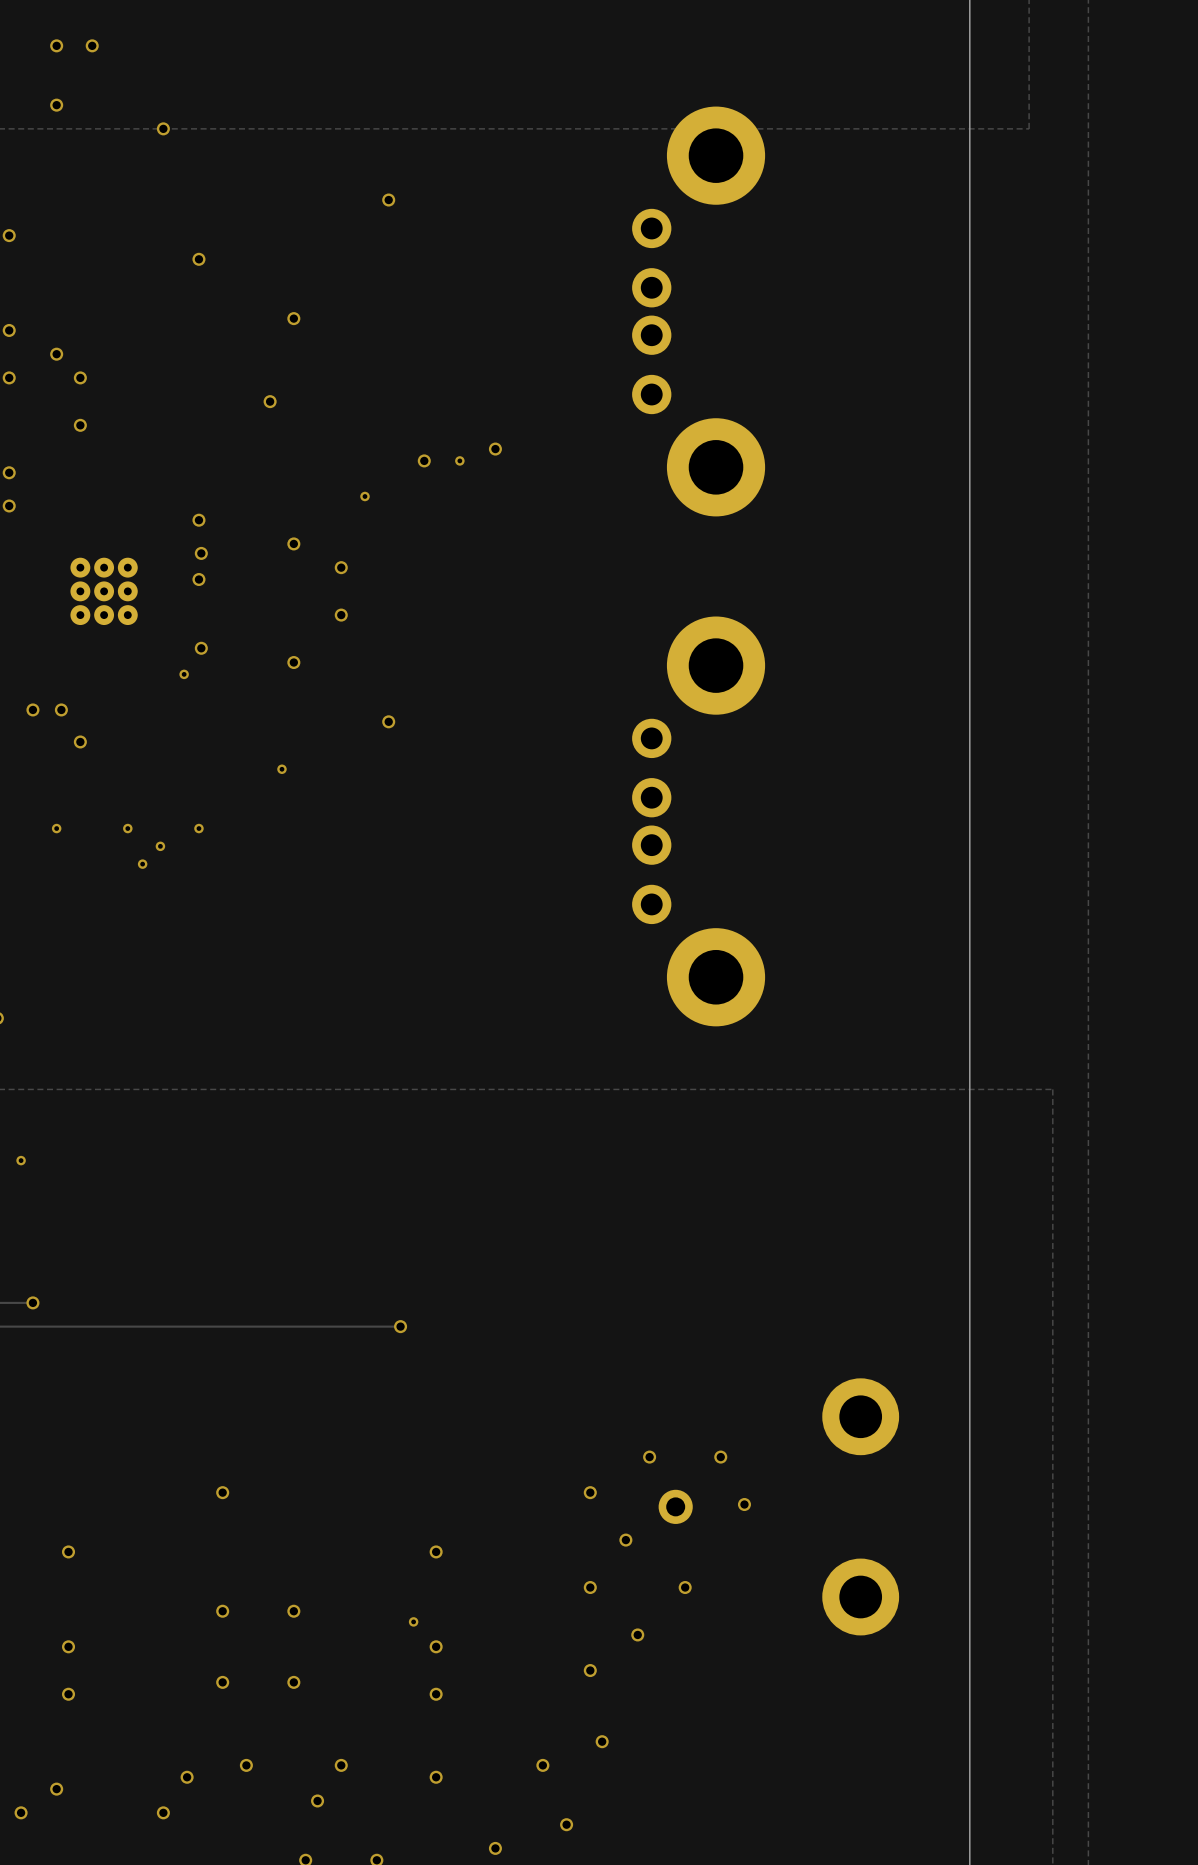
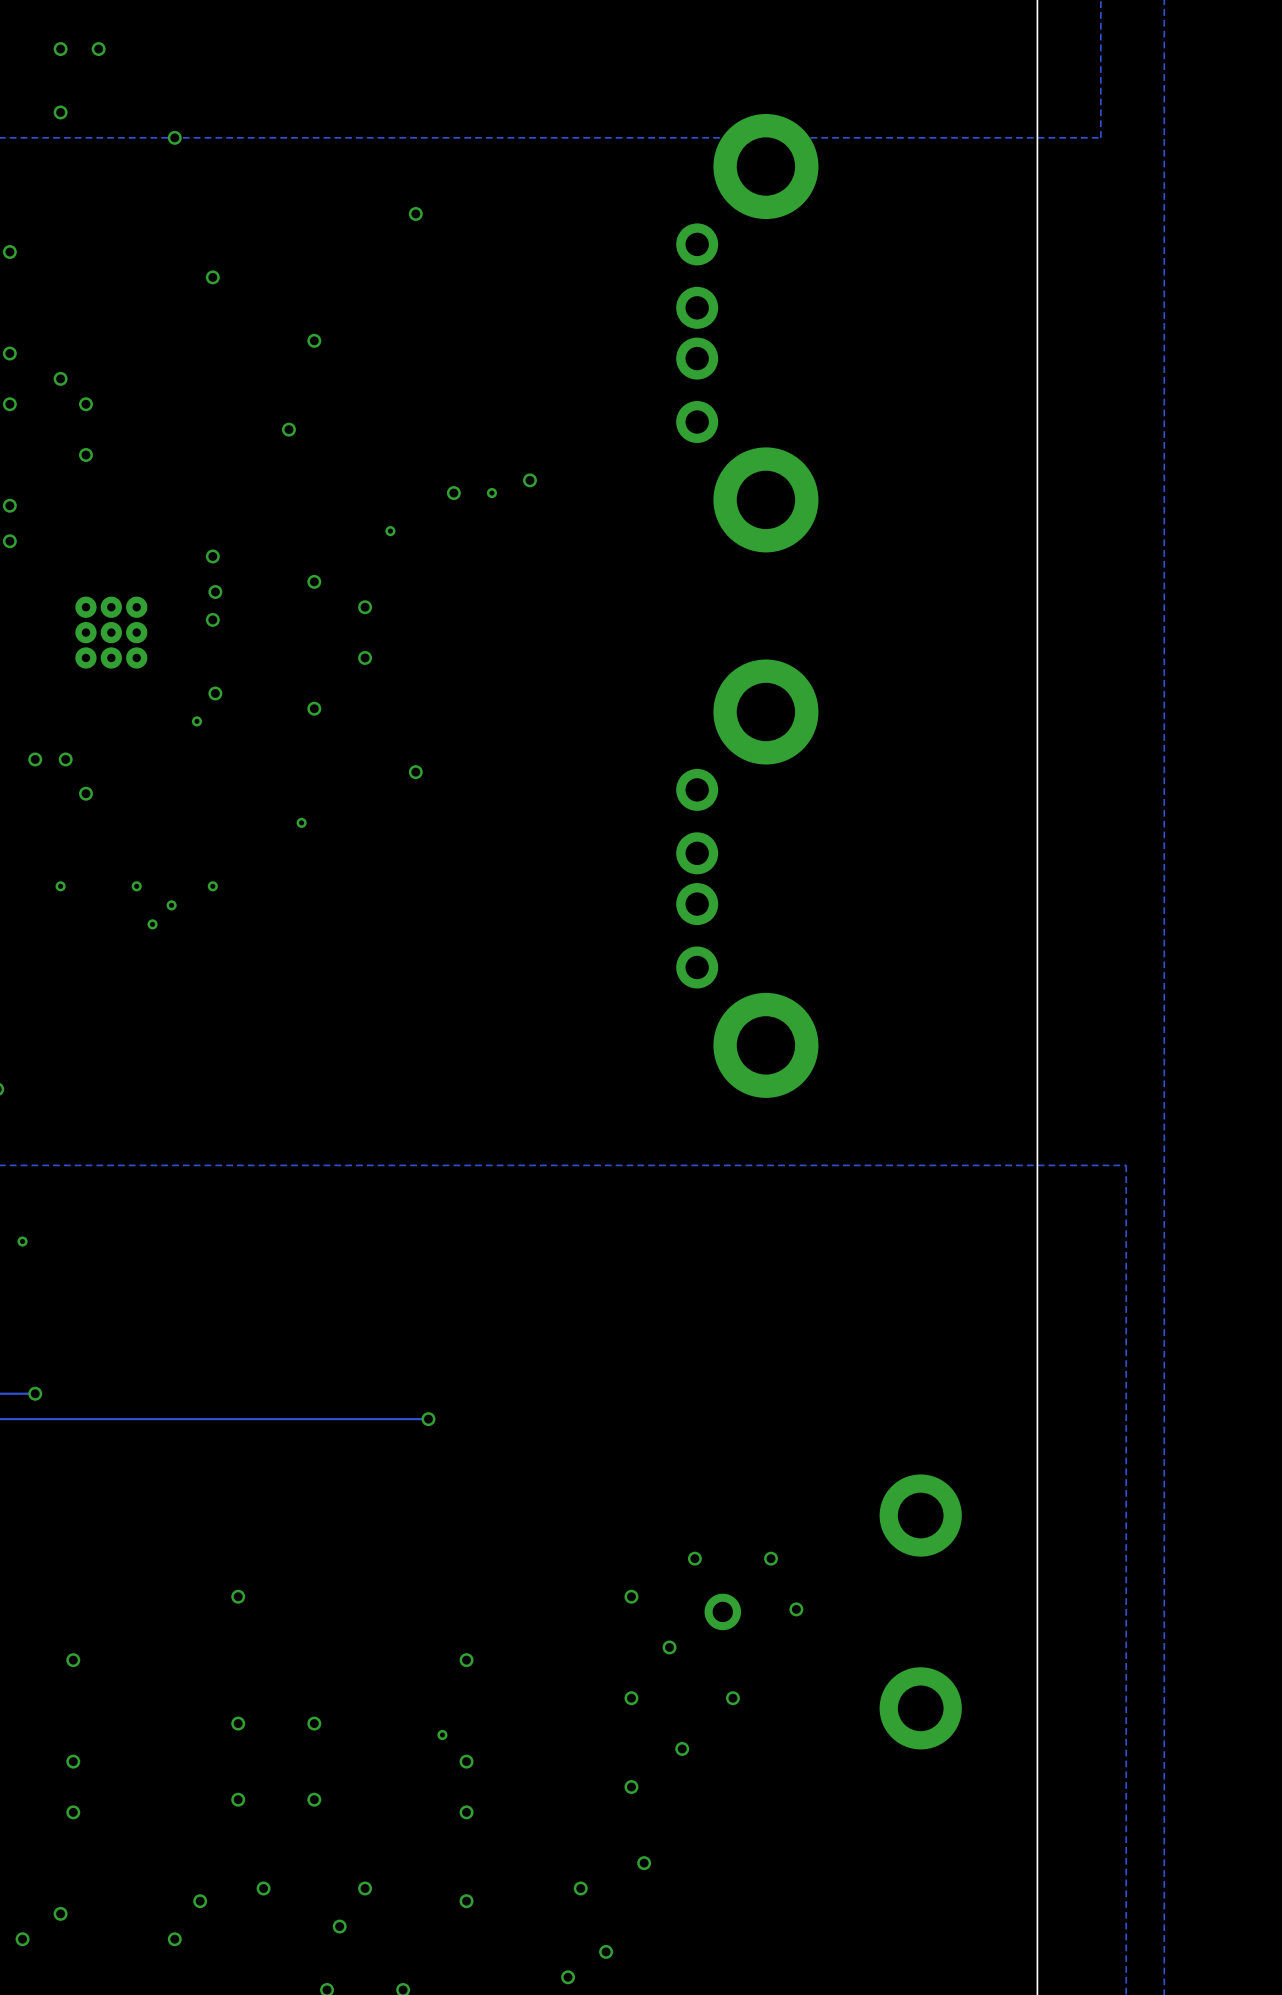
via position: (495, 1848) -> (568, 1977)

